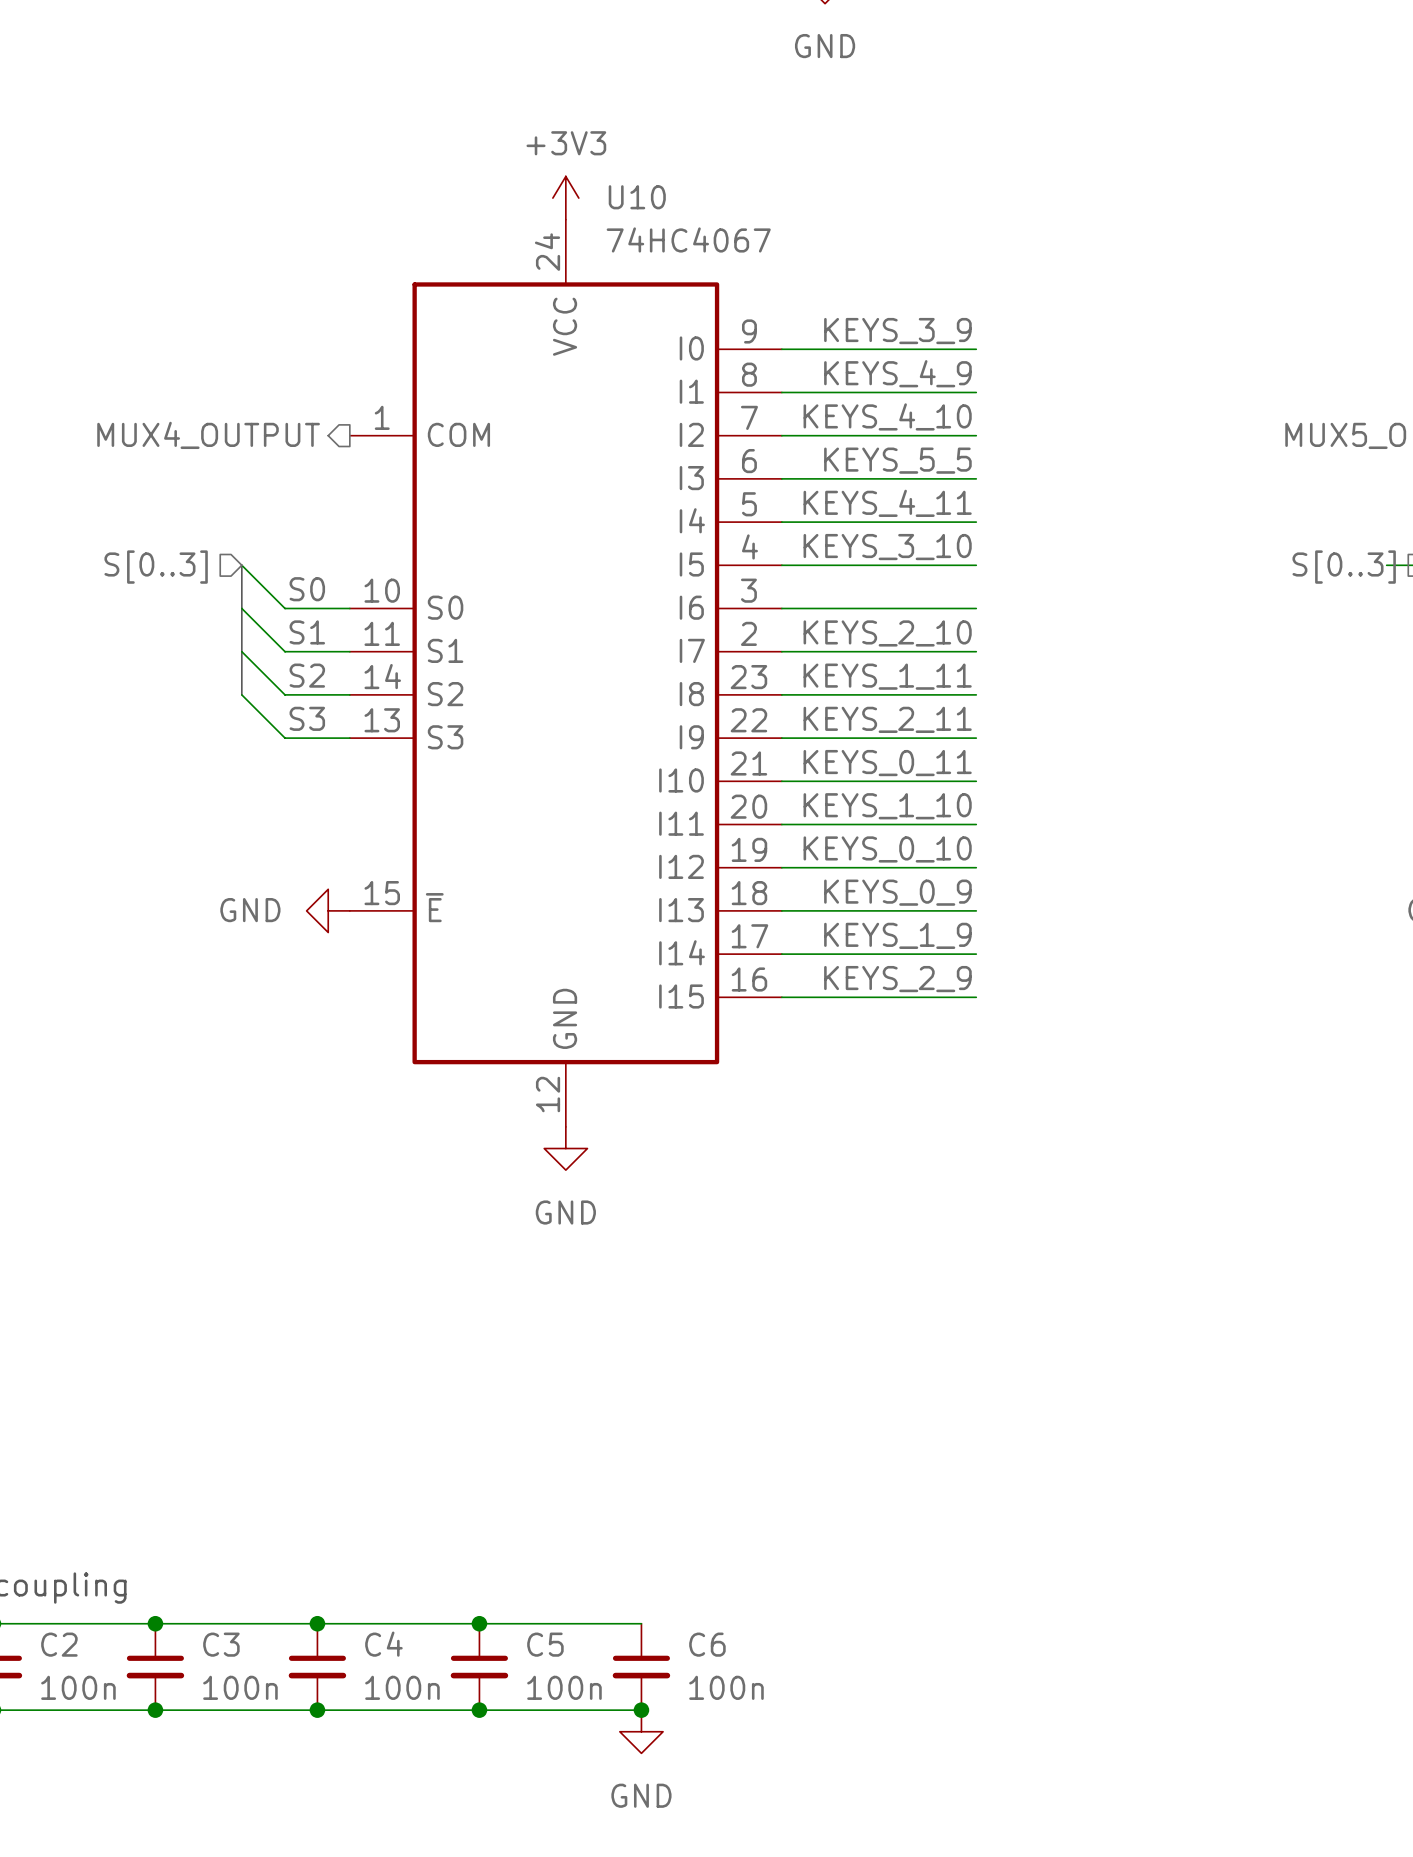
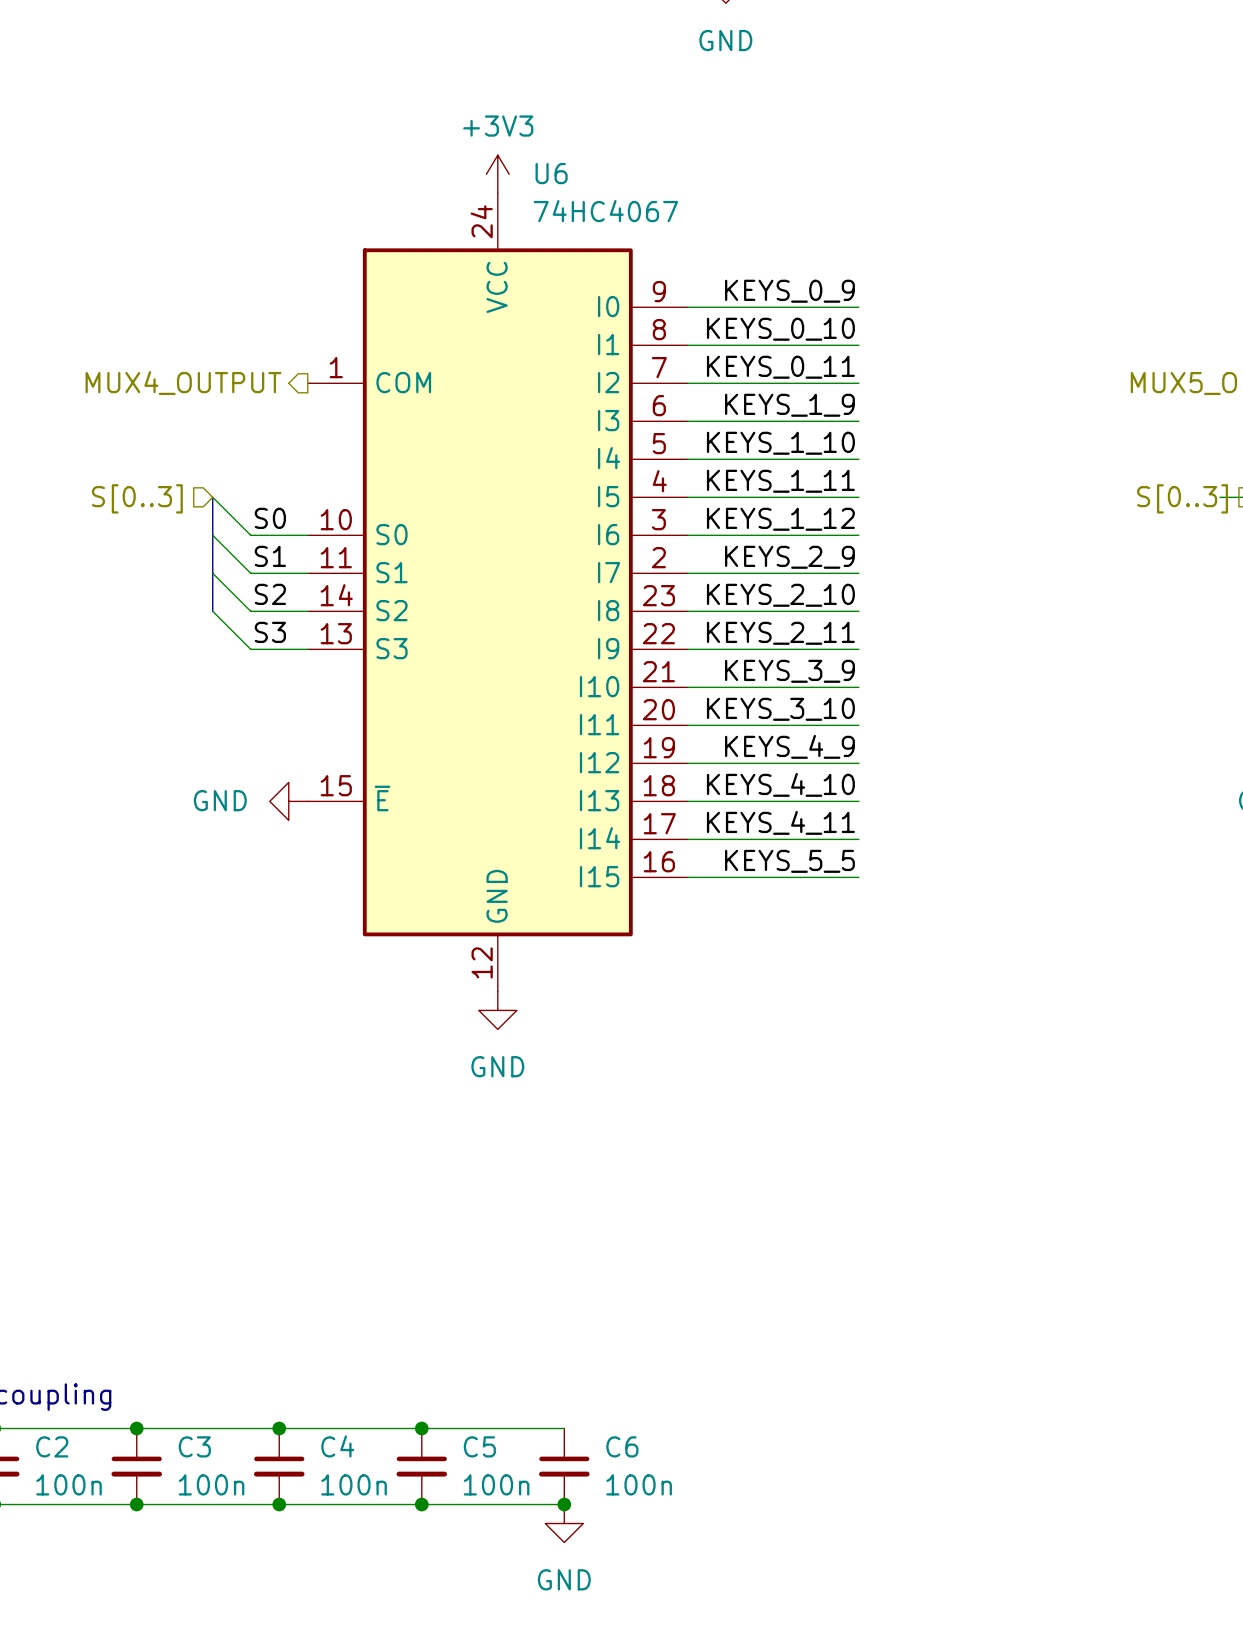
U10 name: U10 (637, 197) -> U6 (551, 173)
label: KEYS_3_9 (897, 331) -> KEYS_0_9 (789, 291)
label: KEYS_4_9 (897, 373) -> KEYS_0_10 (780, 329)
label: KEYS_4_10 (887, 416) -> KEYS_0_11 (780, 367)
label: KEYS_5_5 (897, 460) -> KEYS_1_9 (789, 405)
label: KEYS_4_11 (887, 503) -> KEYS_1_10 (780, 443)
label: KEYS_3_10 (887, 547) -> KEYS_1_11 (780, 481)
label: none -> KEYS_1_12 (780, 519)
label: KEYS_2_10 (887, 633) -> KEYS_2_9 (789, 557)
label: KEYS_1_11 (887, 676) -> KEYS_2_10 (780, 595)
label: KEYS_0_11 (887, 763) -> KEYS_3_9 (789, 671)
label: KEYS_1_10 (887, 806) -> KEYS_3_10 (780, 709)
label: KEYS_0_10 (887, 849) -> KEYS_4_9 (789, 746)
label: KEYS_0_9 (897, 892) -> KEYS_4_10 (780, 784)
label: KEYS_1_9 (897, 935) -> KEYS_4_11 (780, 822)
label: KEYS_2_9 (897, 979) -> KEYS_5_5 (789, 861)

